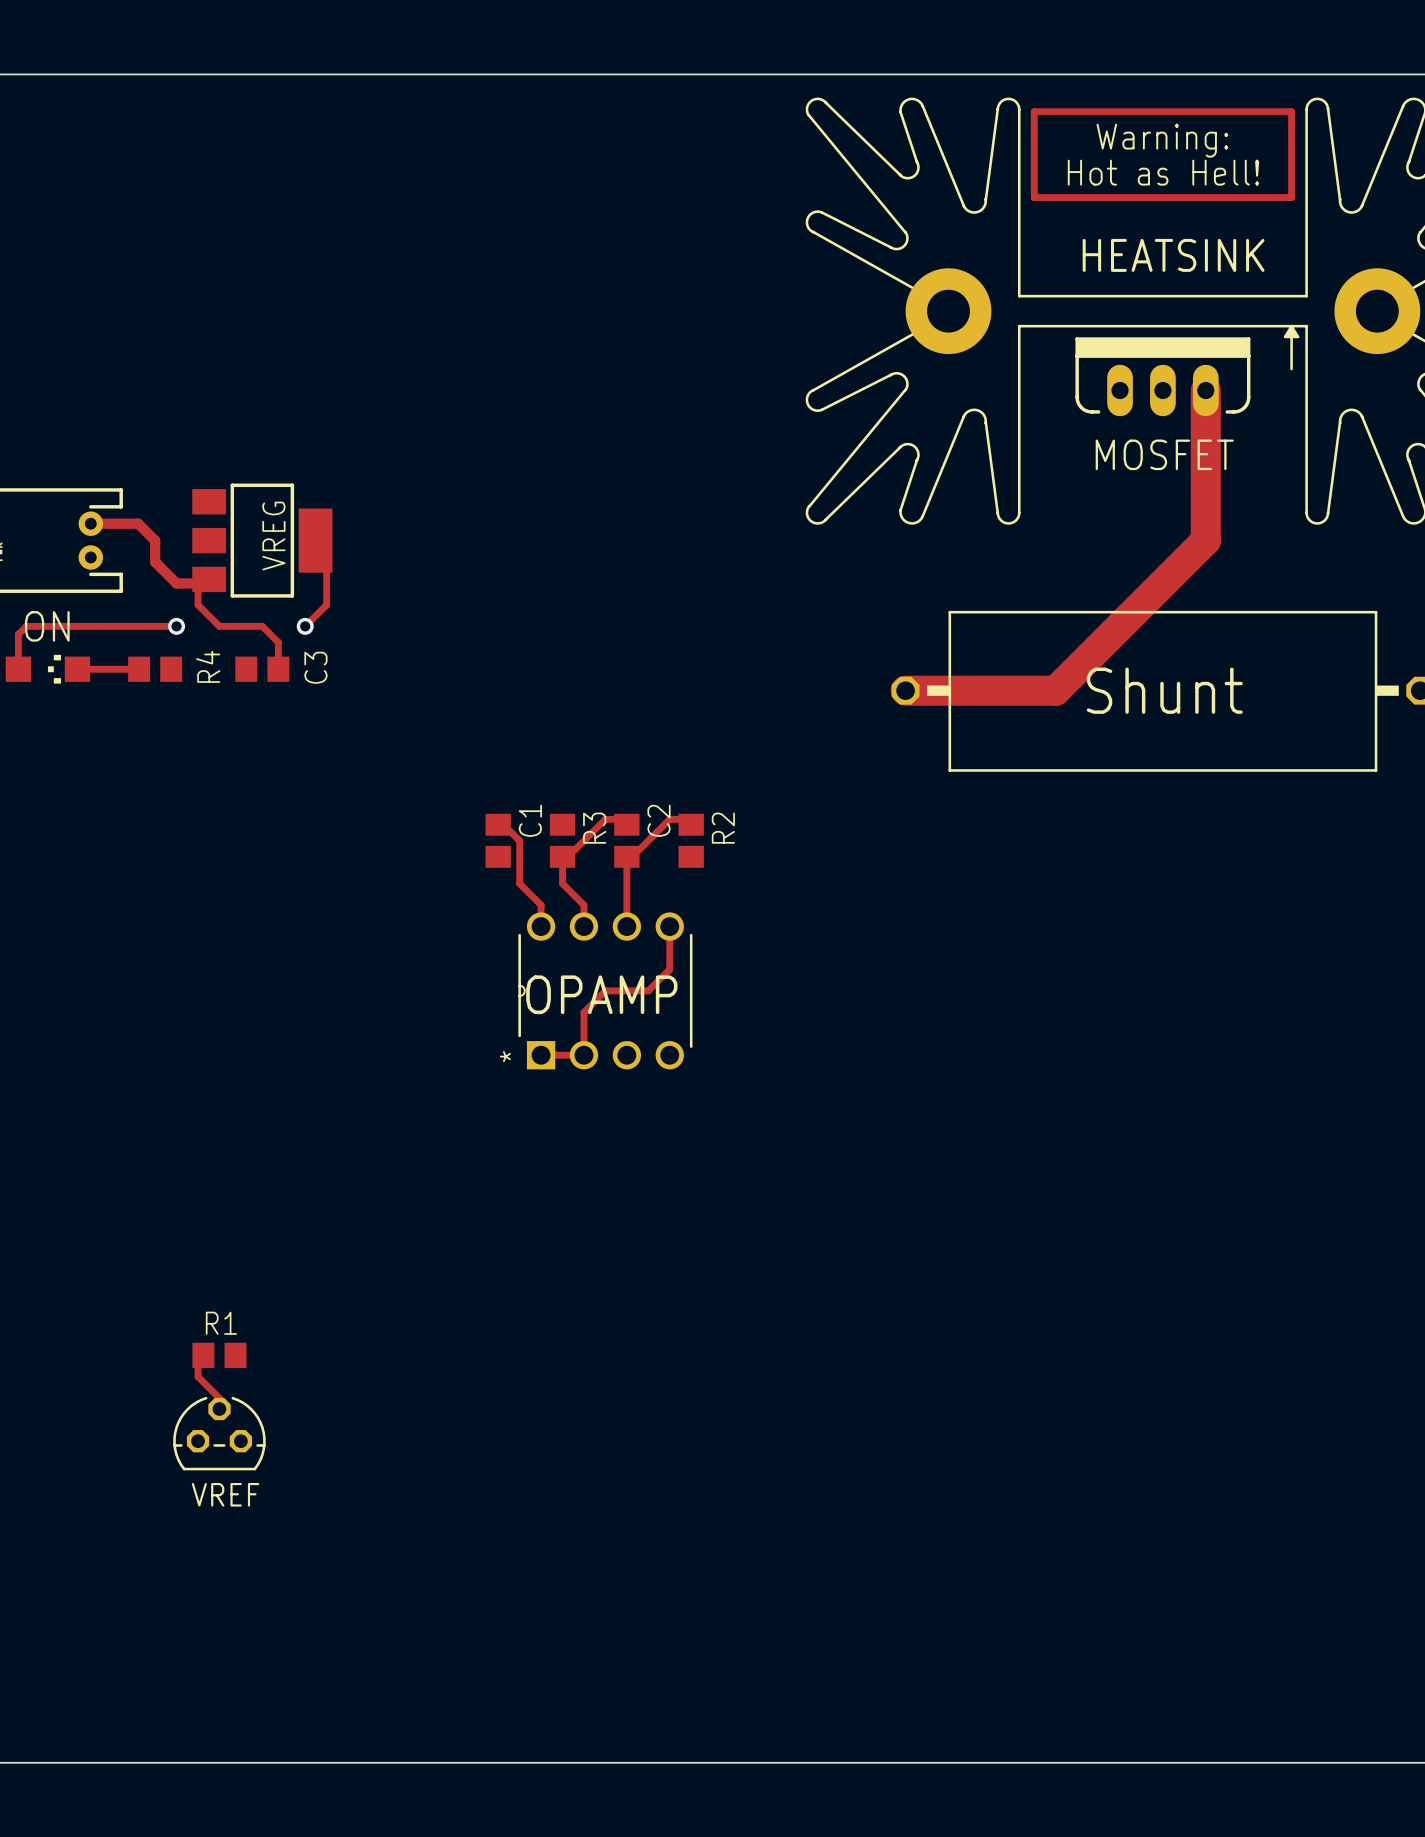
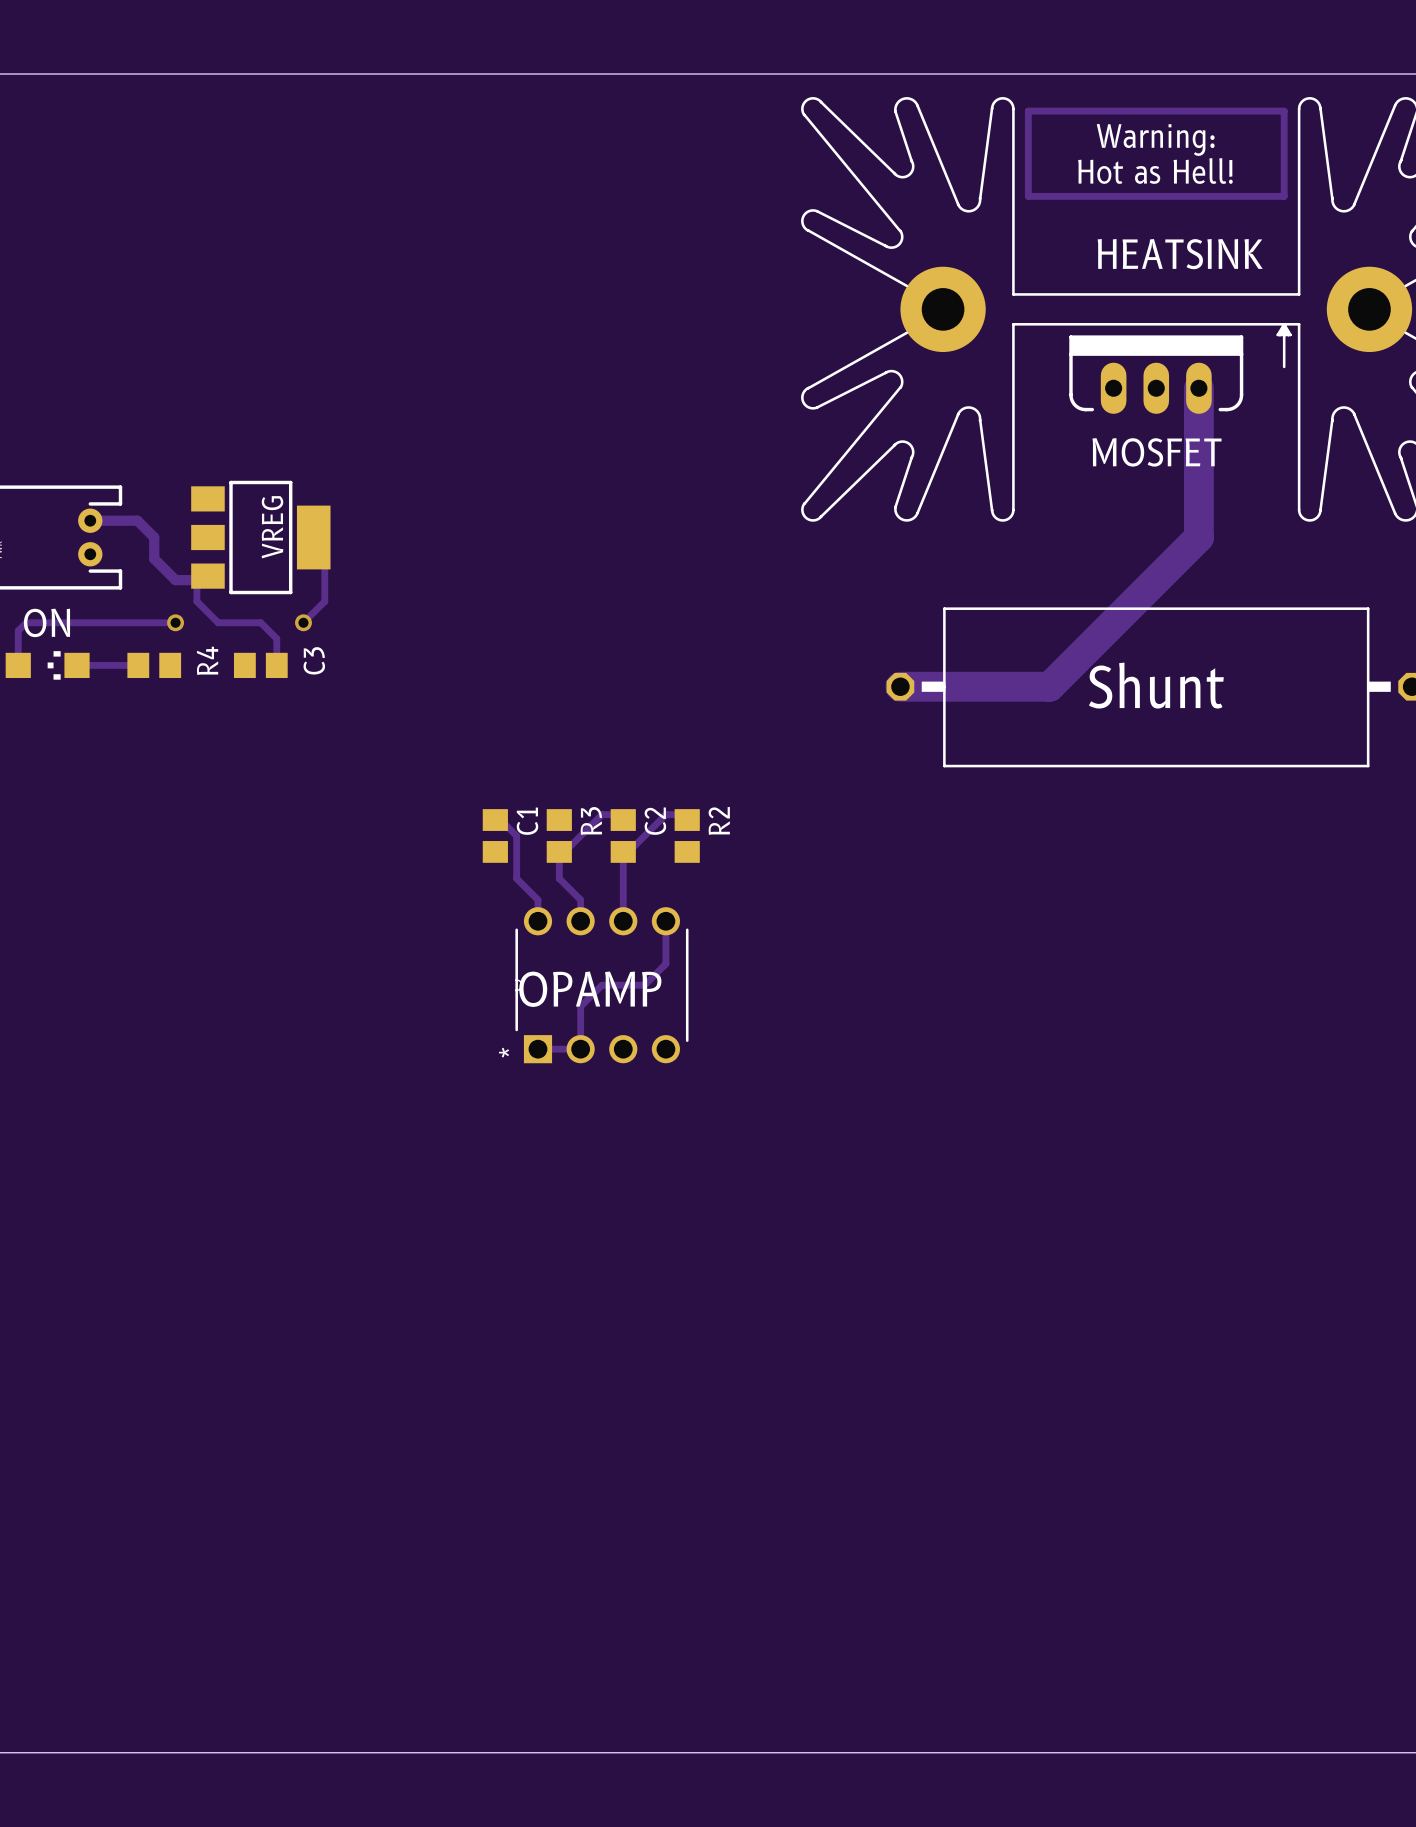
track: (203, 1355) (198, 1360) (198, 1376) (219, 1398) (219, 1409) -> none
R1: (219, 1355) -> none
VREF: (219, 1433) -> none

